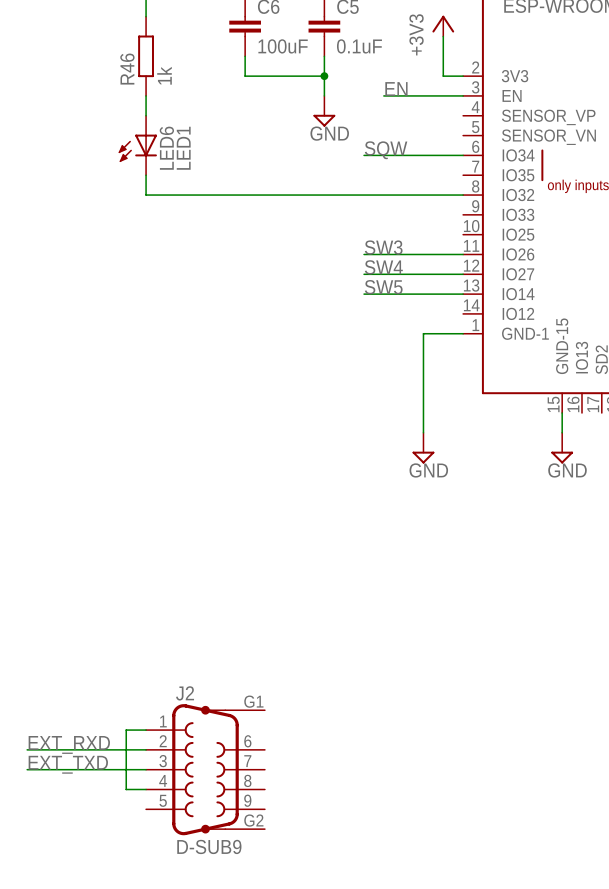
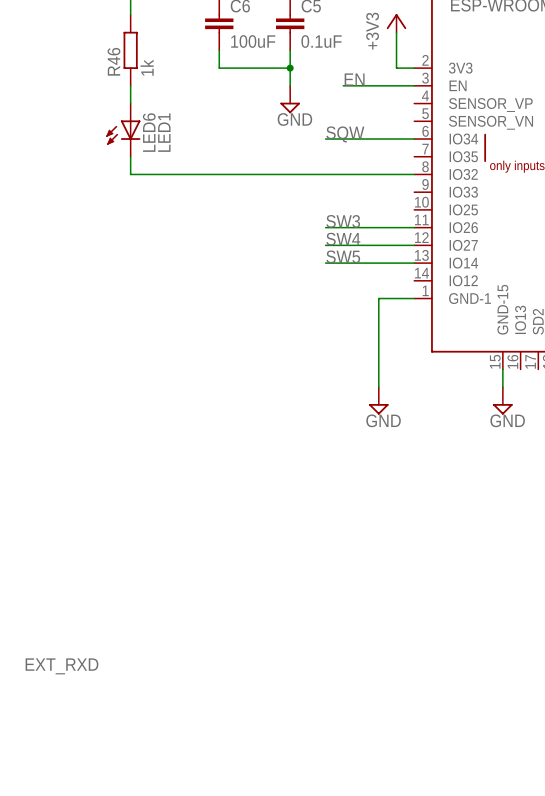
wire: (146, 730) (126, 730) (126, 789) (146, 789) -> none
wire: (27, 749) (146, 749) -> none
label: EXT_TXD (68, 764) -> none
wire: (27, 769) (146, 769) -> none
J2: D-SUB9 (205, 769) -> none

